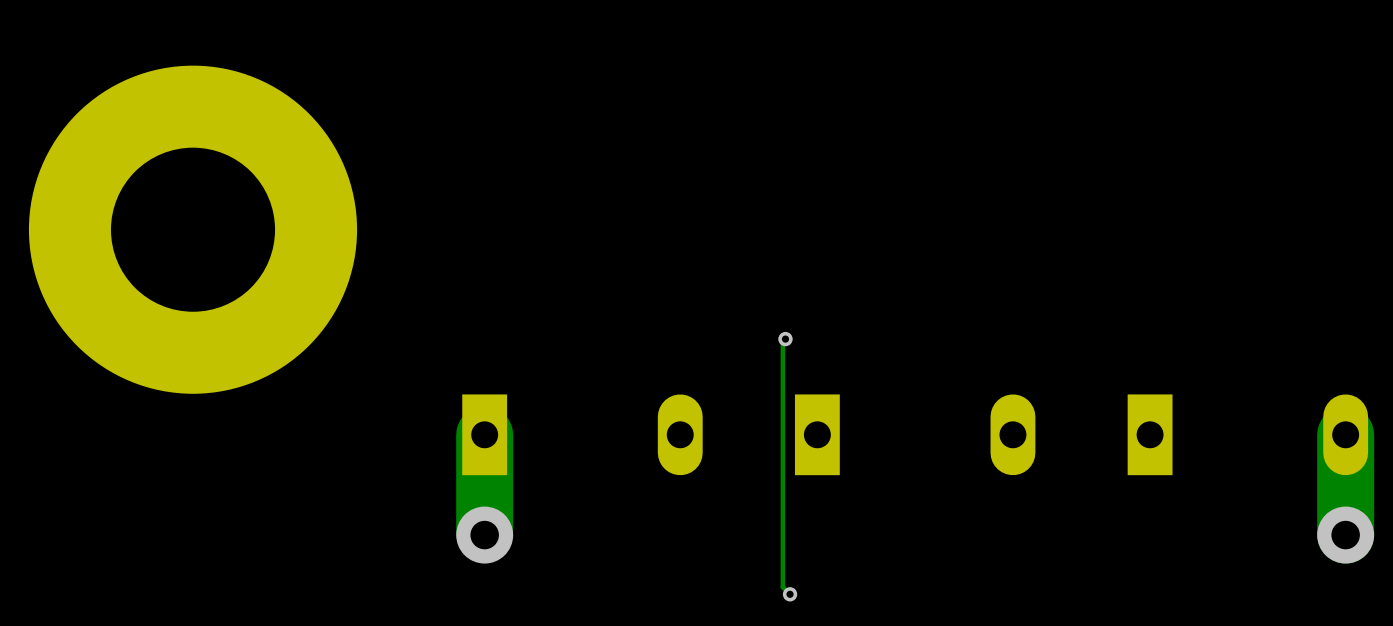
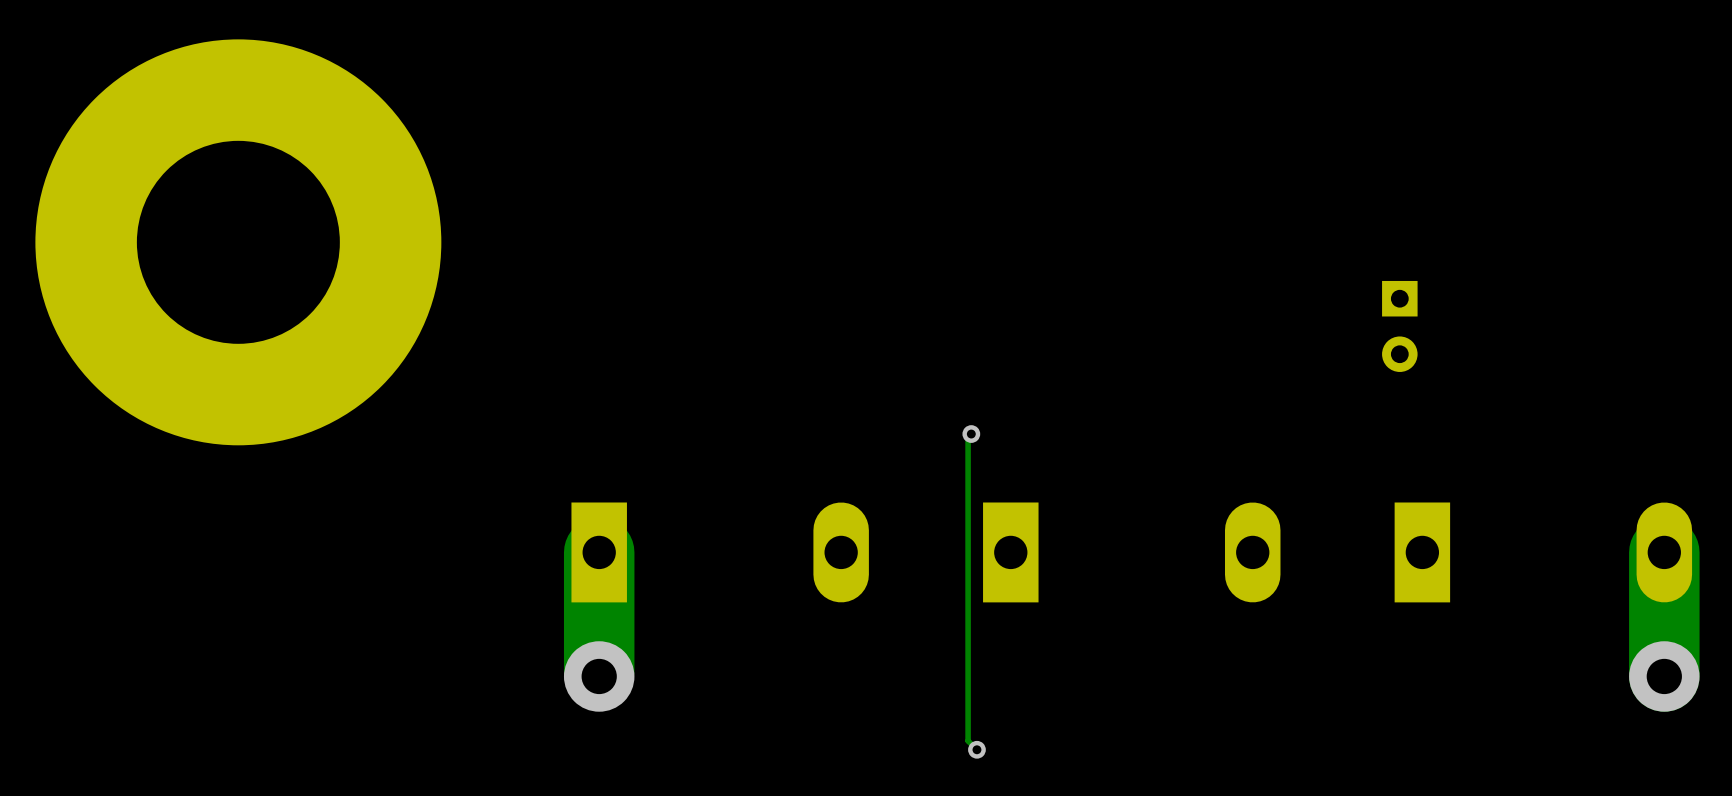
part position: (193, 229) -> (238, 242)
part: none -> (1399, 326)

